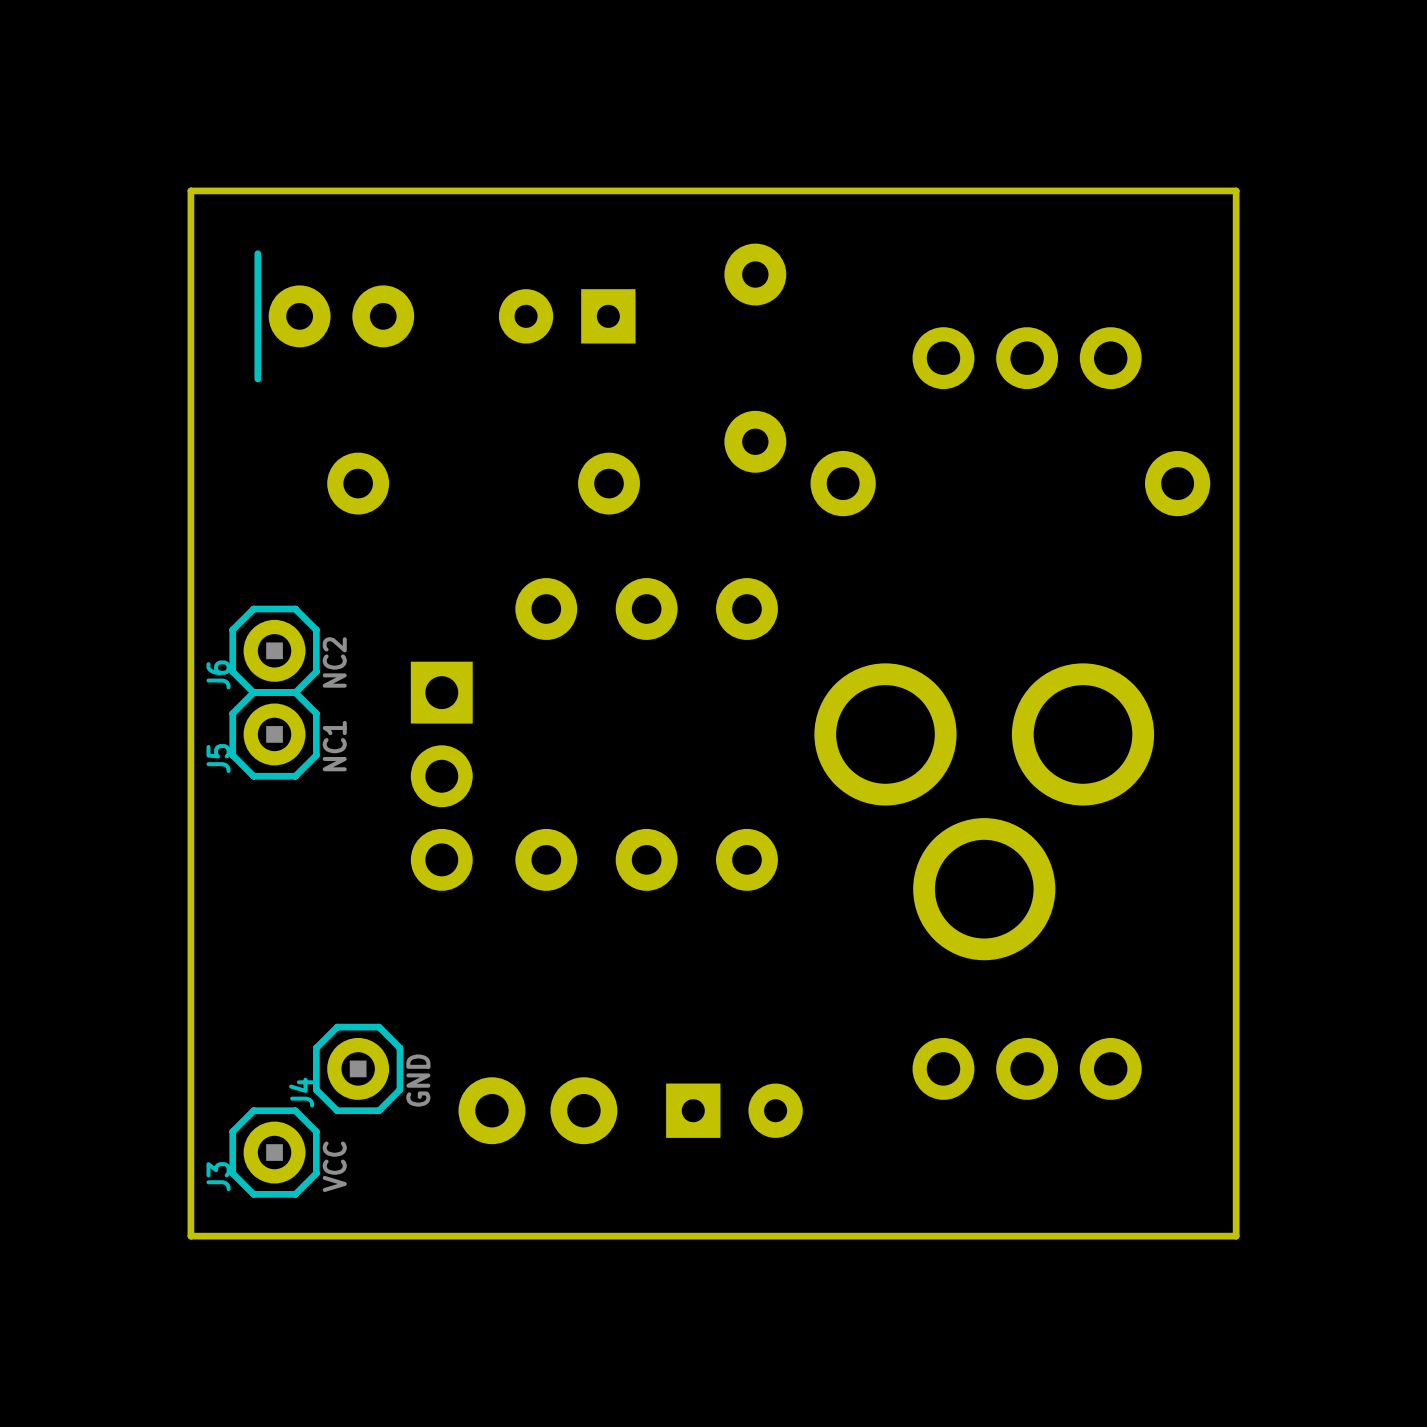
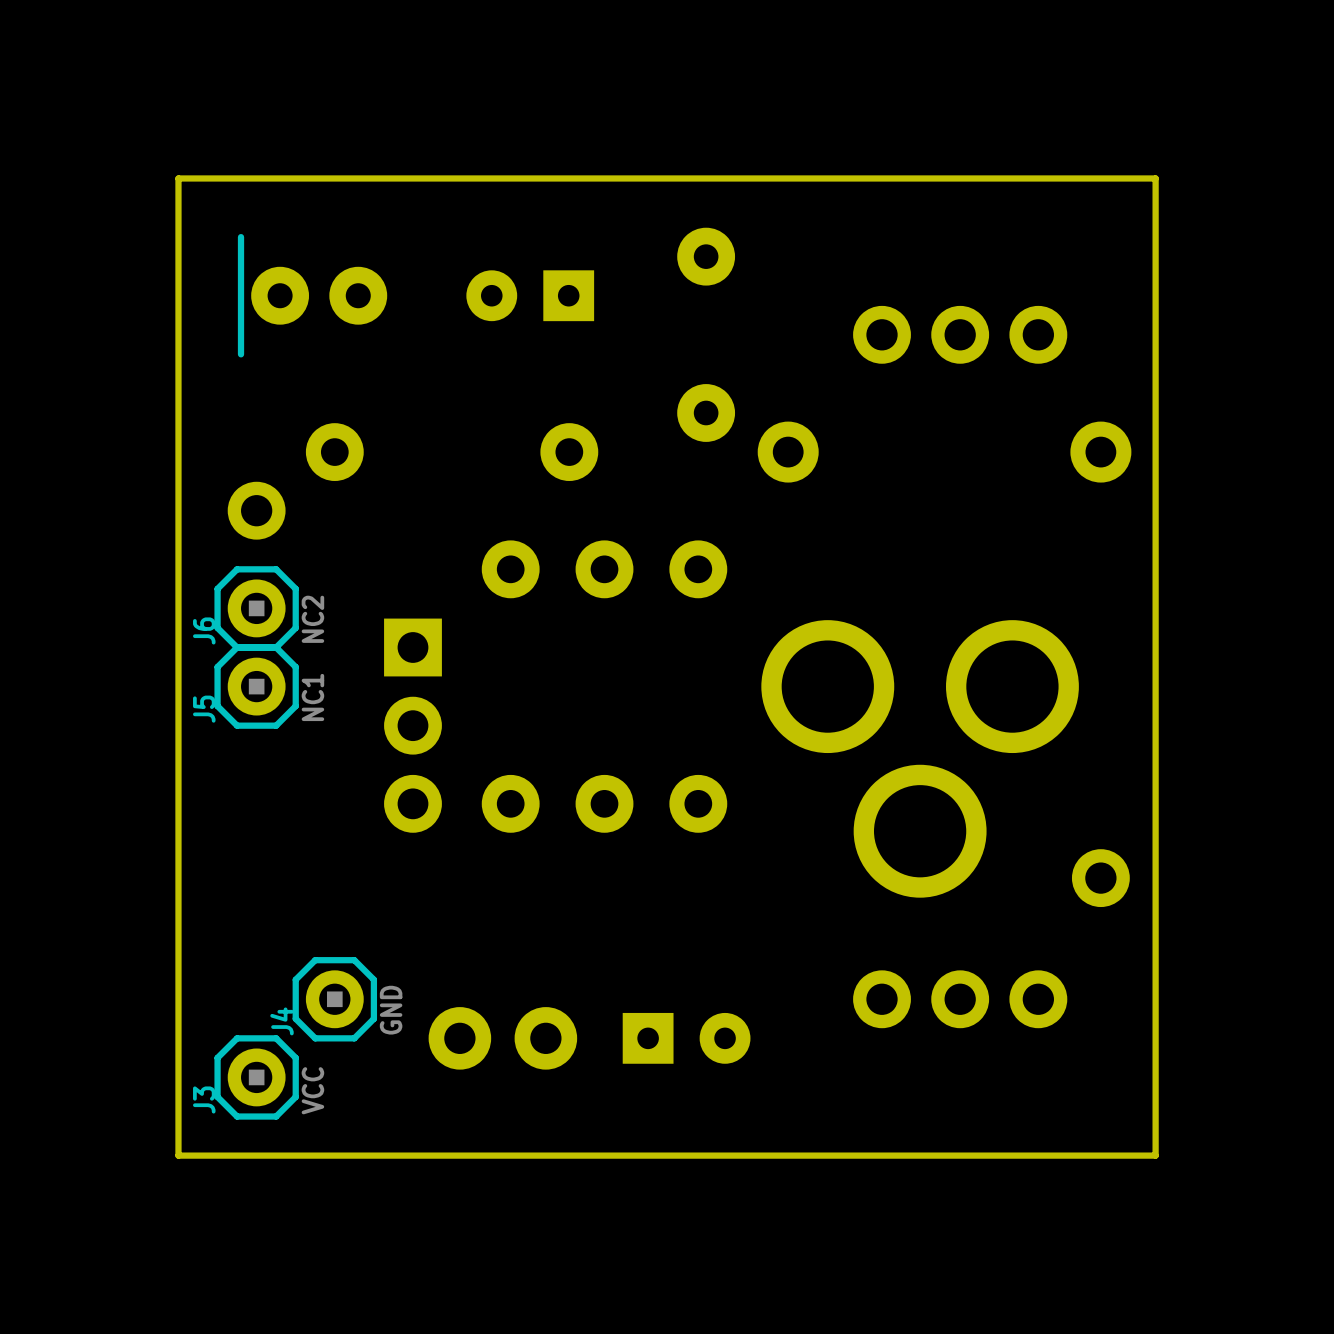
part: none -> (256, 510)
part: none -> (1100, 878)

